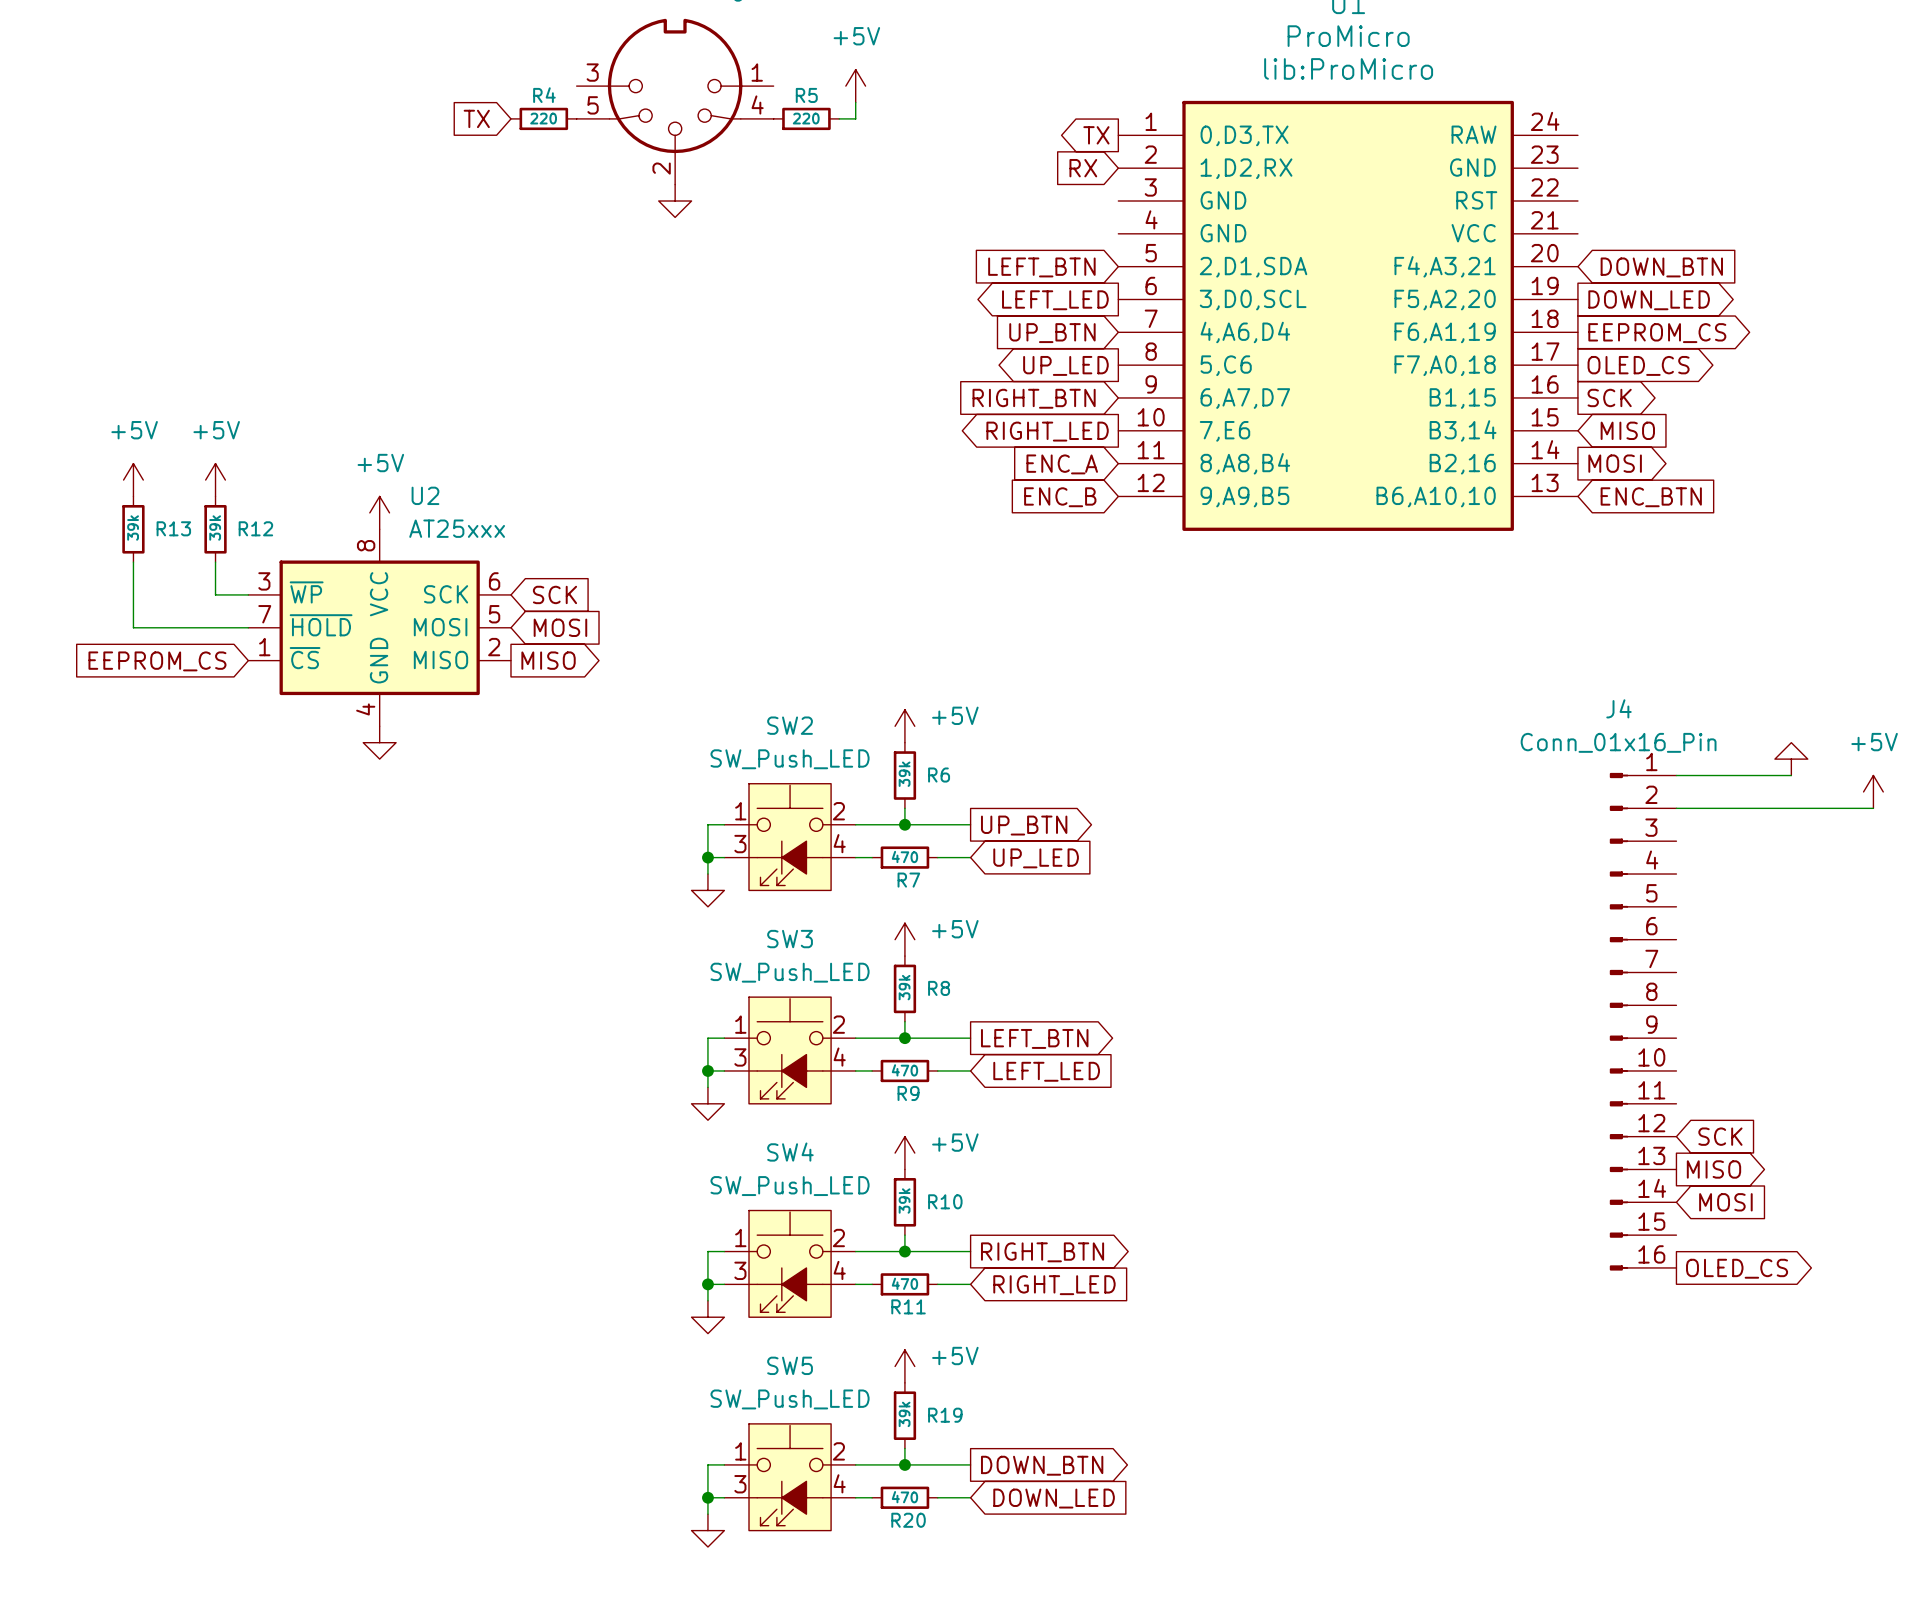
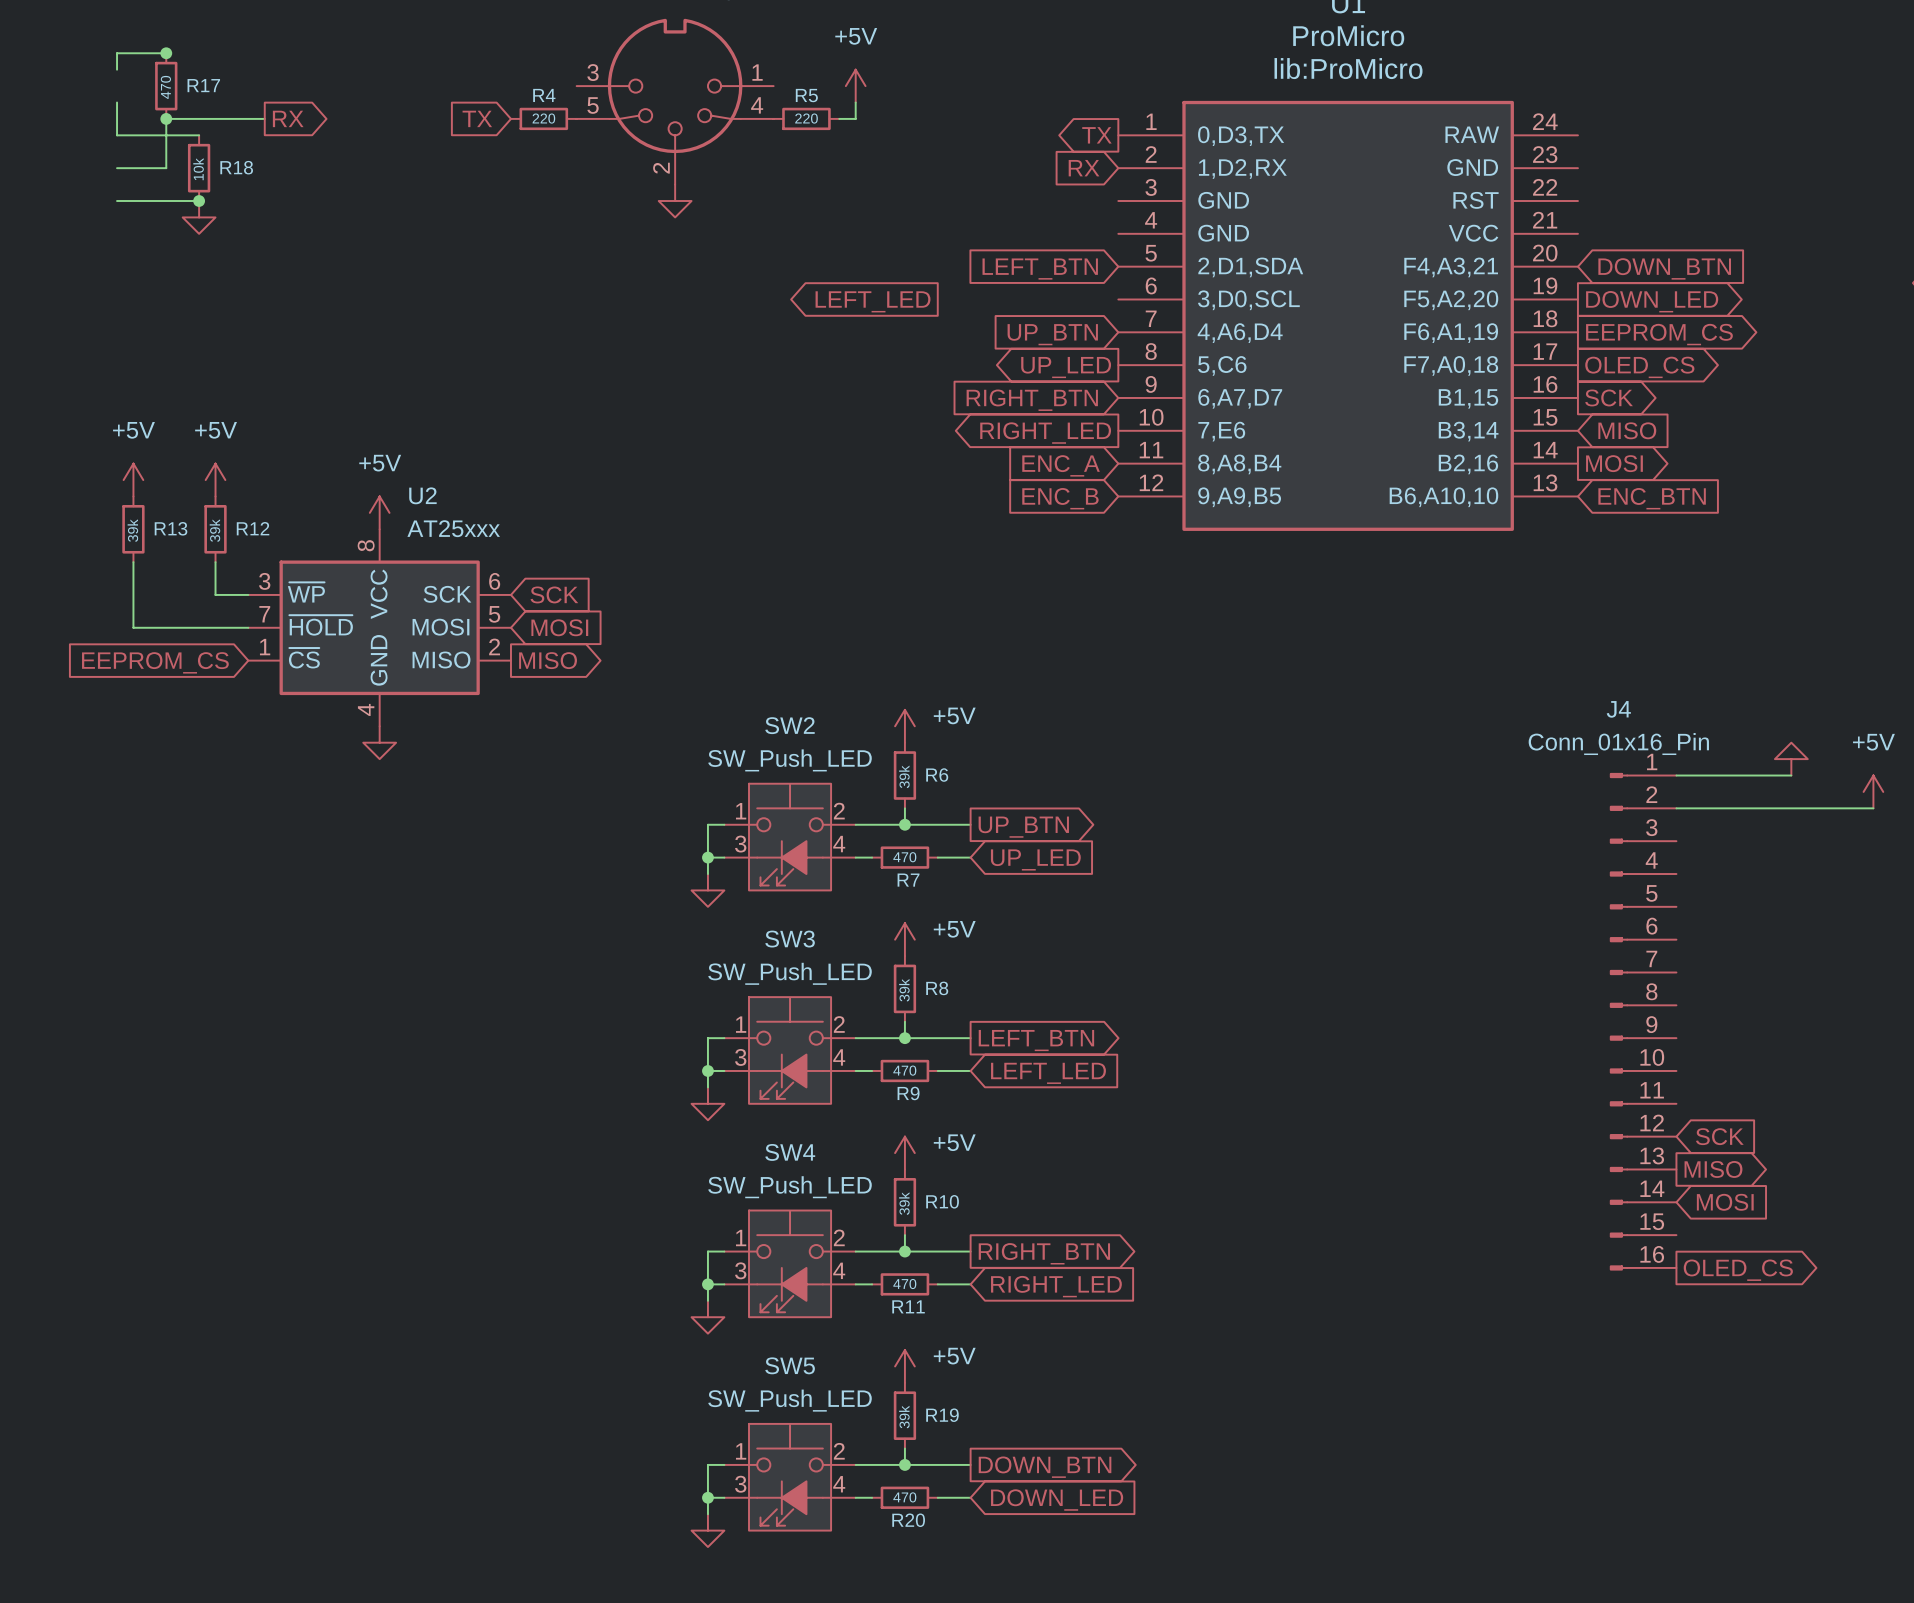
wire: none -> (166, 53) (117, 53) (117, 69)
junction: none -> (166, 53)
R17: none -> 470 (166, 86)
wire: none -> (117, 102) (117, 135) (199, 135)
junction: none -> (166, 118)
wire: none -> (264, 118) (166, 118) (166, 168) (117, 168)
global label: none -> RX (288, 118)
R18: none -> 10k (199, 168)
wire: none -> (117, 201) (199, 201)
junction: none -> (199, 201)
power symbol: none -> (199, 217)
global label position: LEFT_LED (1055, 300) -> LEFT_LED (873, 301)

